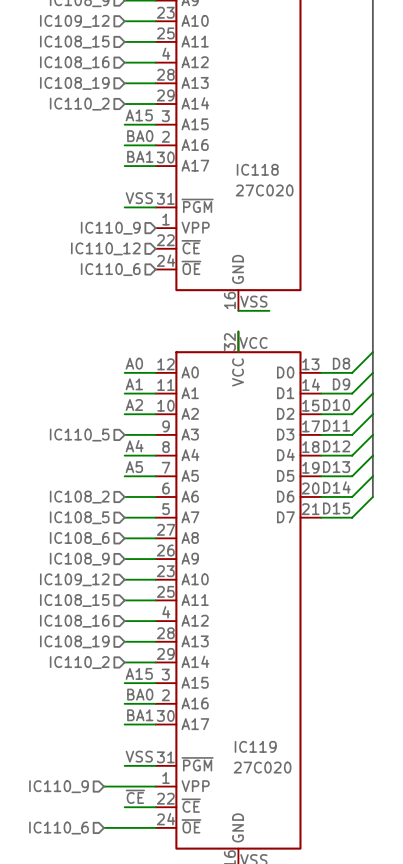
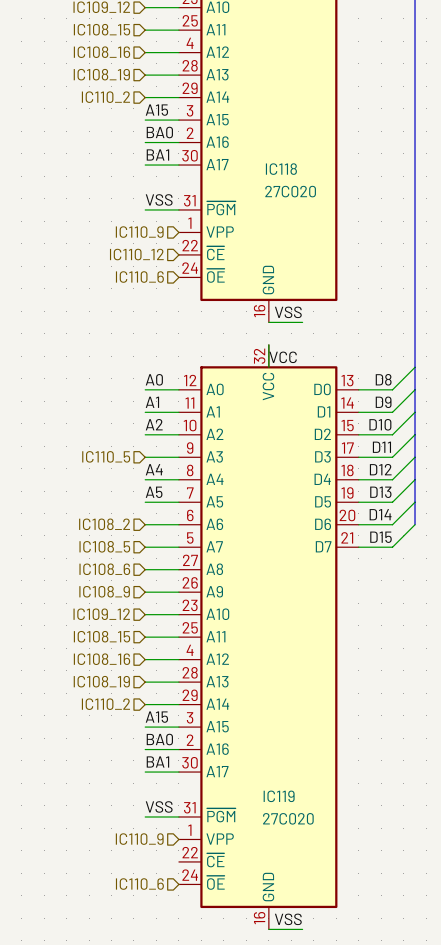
hierarchical label position: IC110_9 (59, 786) -> IC110_9 (139, 839)
wire: (103, 786) (155, 786) -> none
label: ~{CE} (135, 796) -> none
wire: (124, 807) (155, 807) -> none
wire: (103, 827) (155, 827) -> none
hierarchical label position: IC110_6 (59, 828) -> IC110_6 (139, 884)

